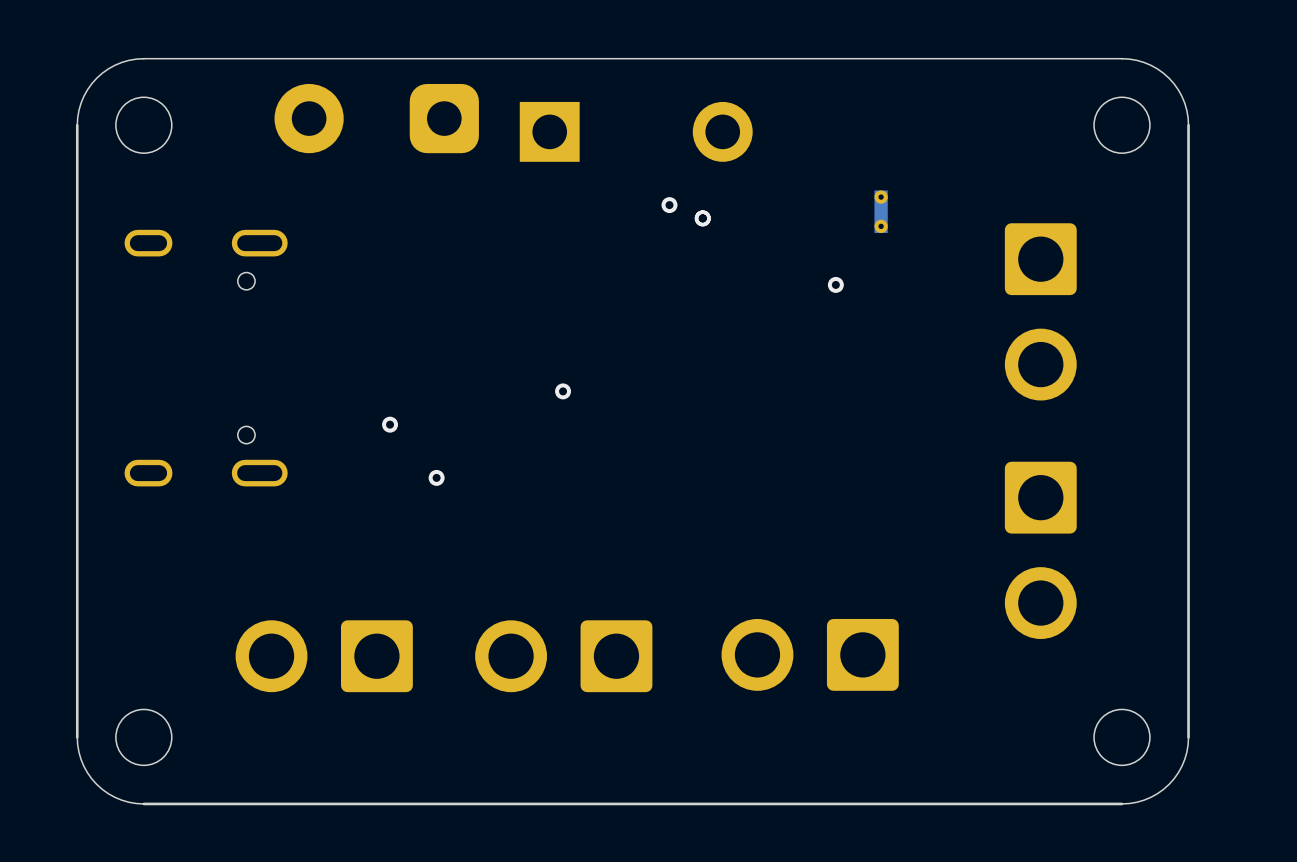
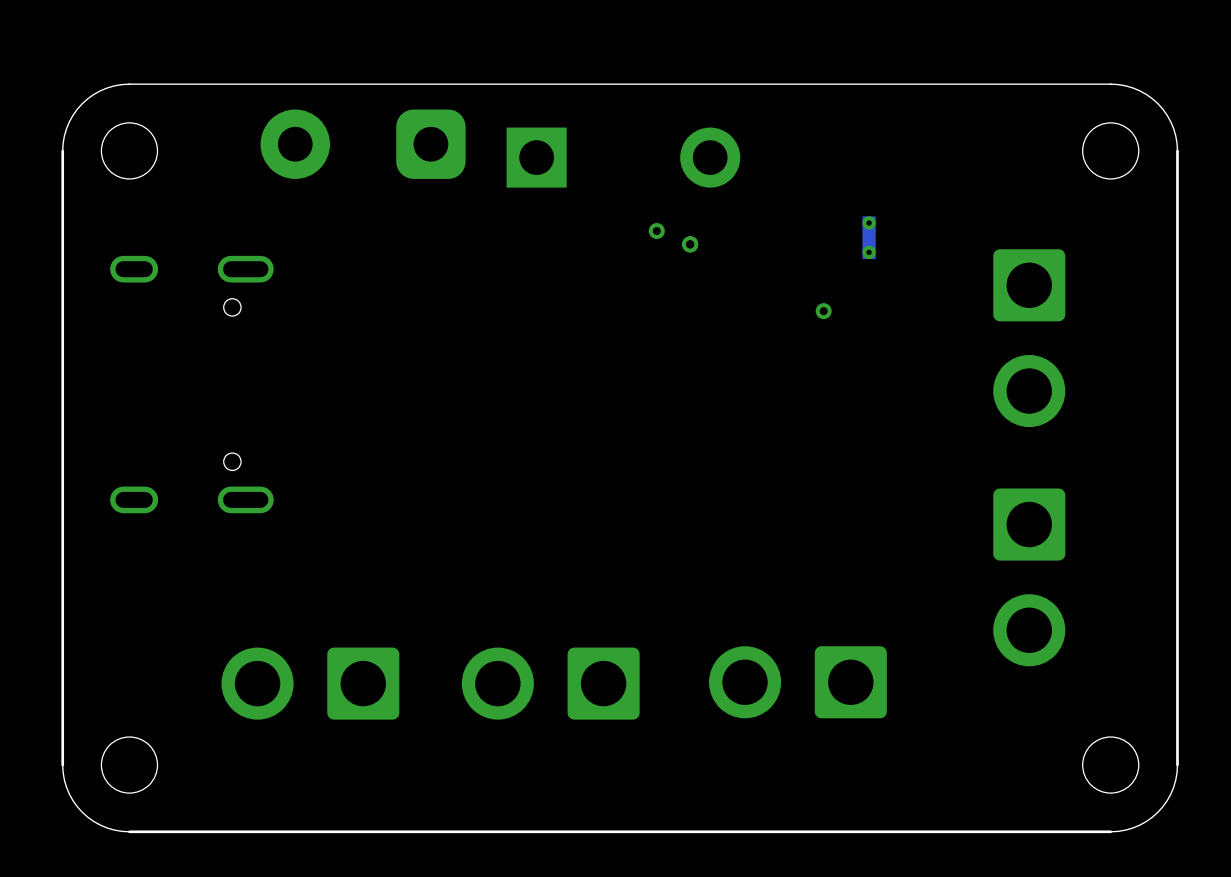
via: (563, 391) -> none
via: (390, 424) -> none
via: (436, 477) -> none

